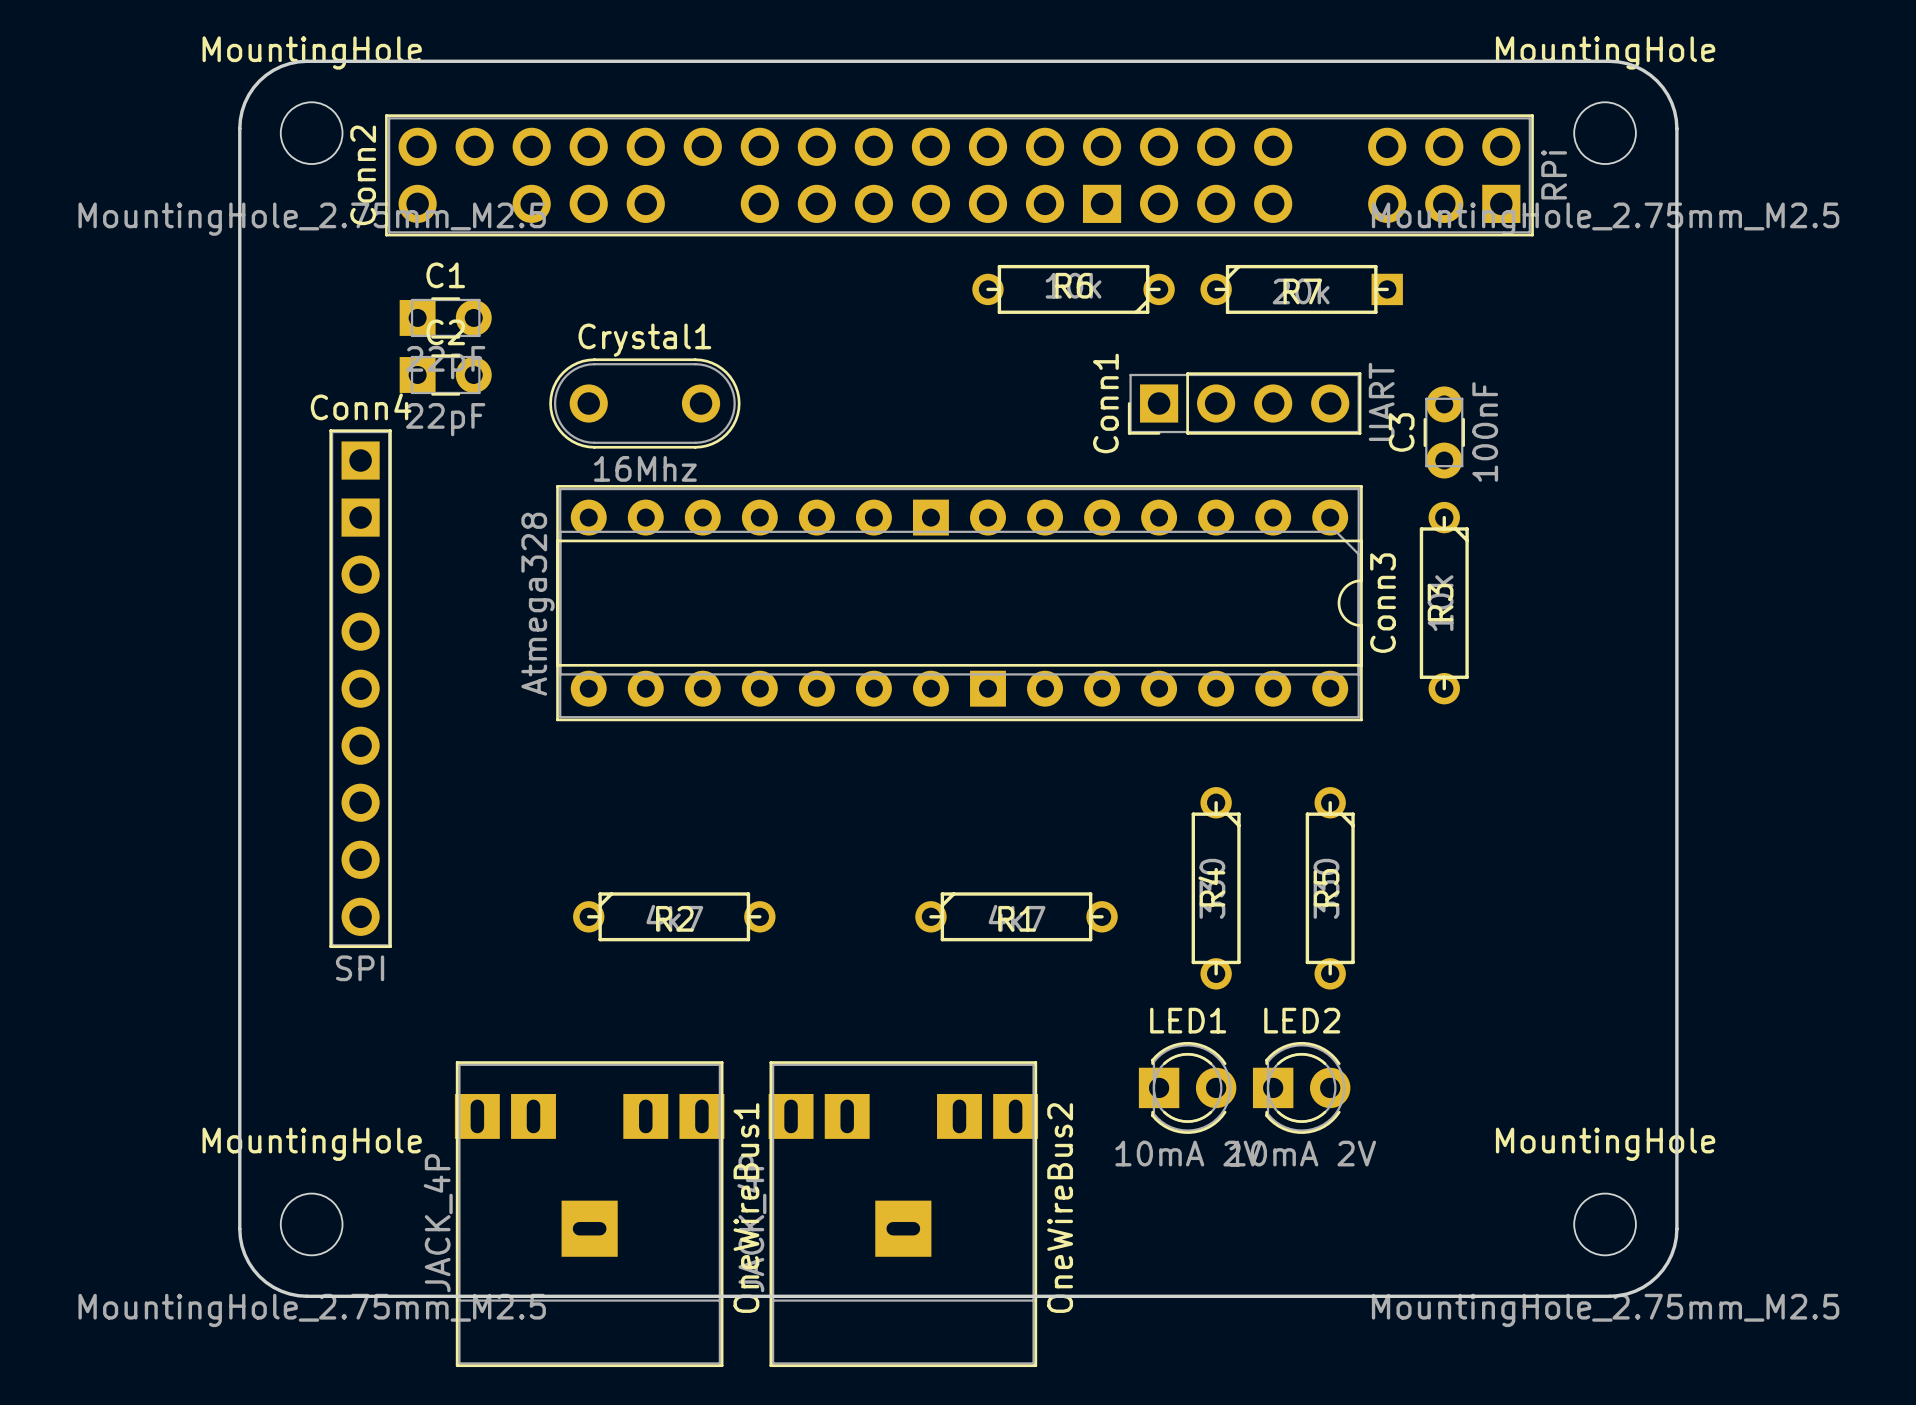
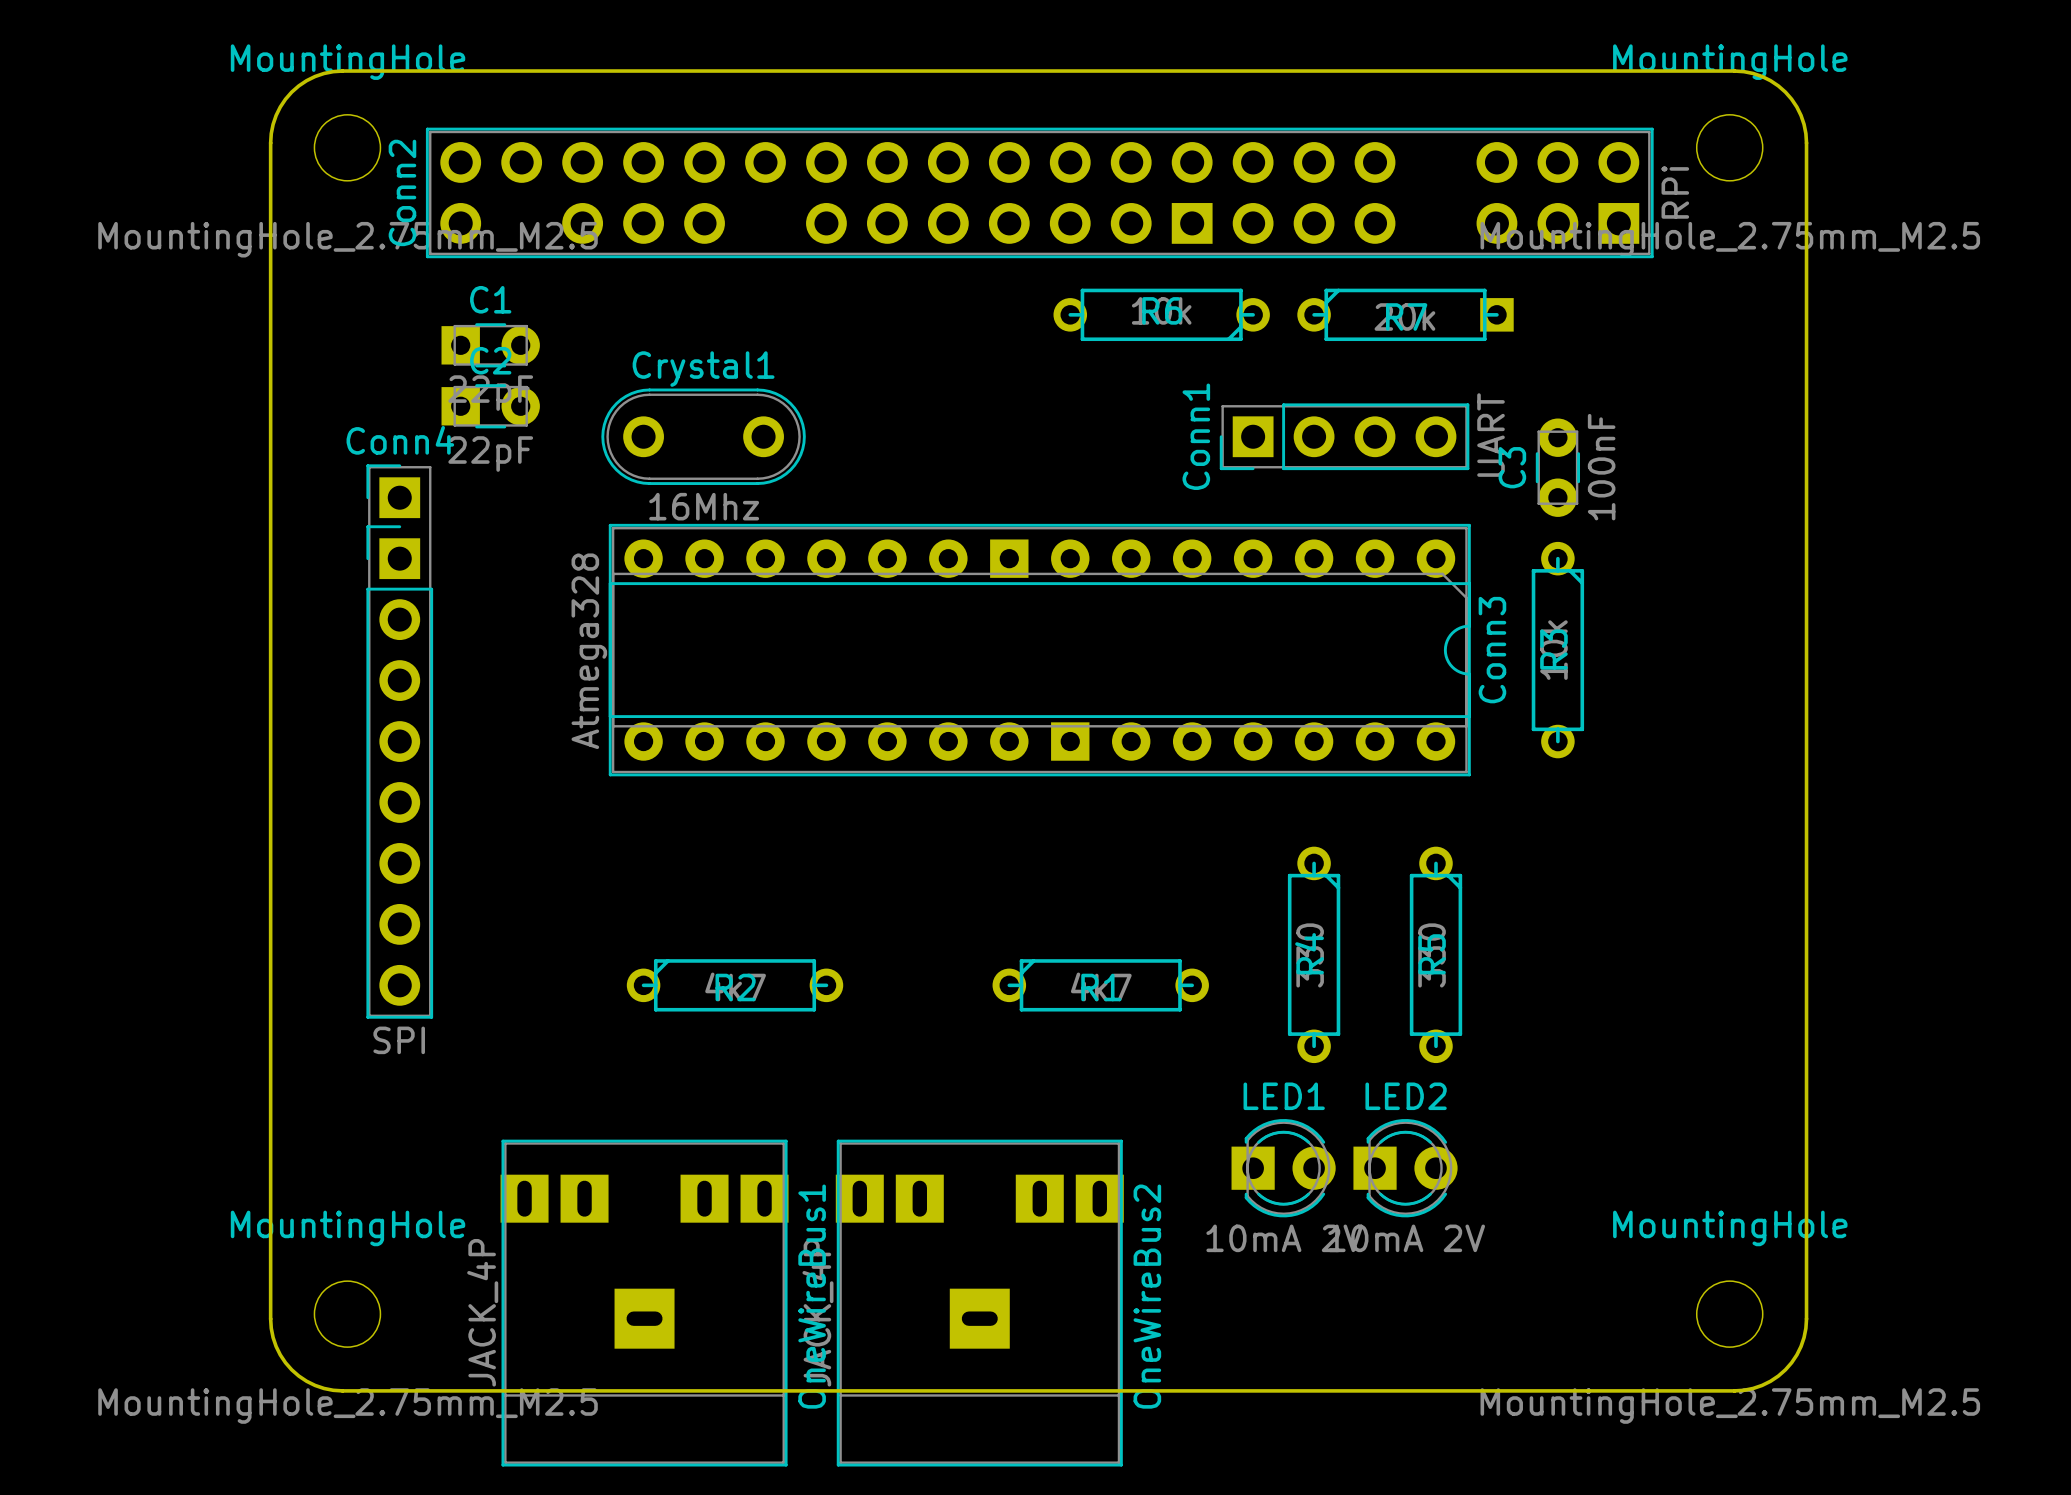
Conn4 footprint: [329, 429, 392, 949] -> [366, 464, 434, 1019]

